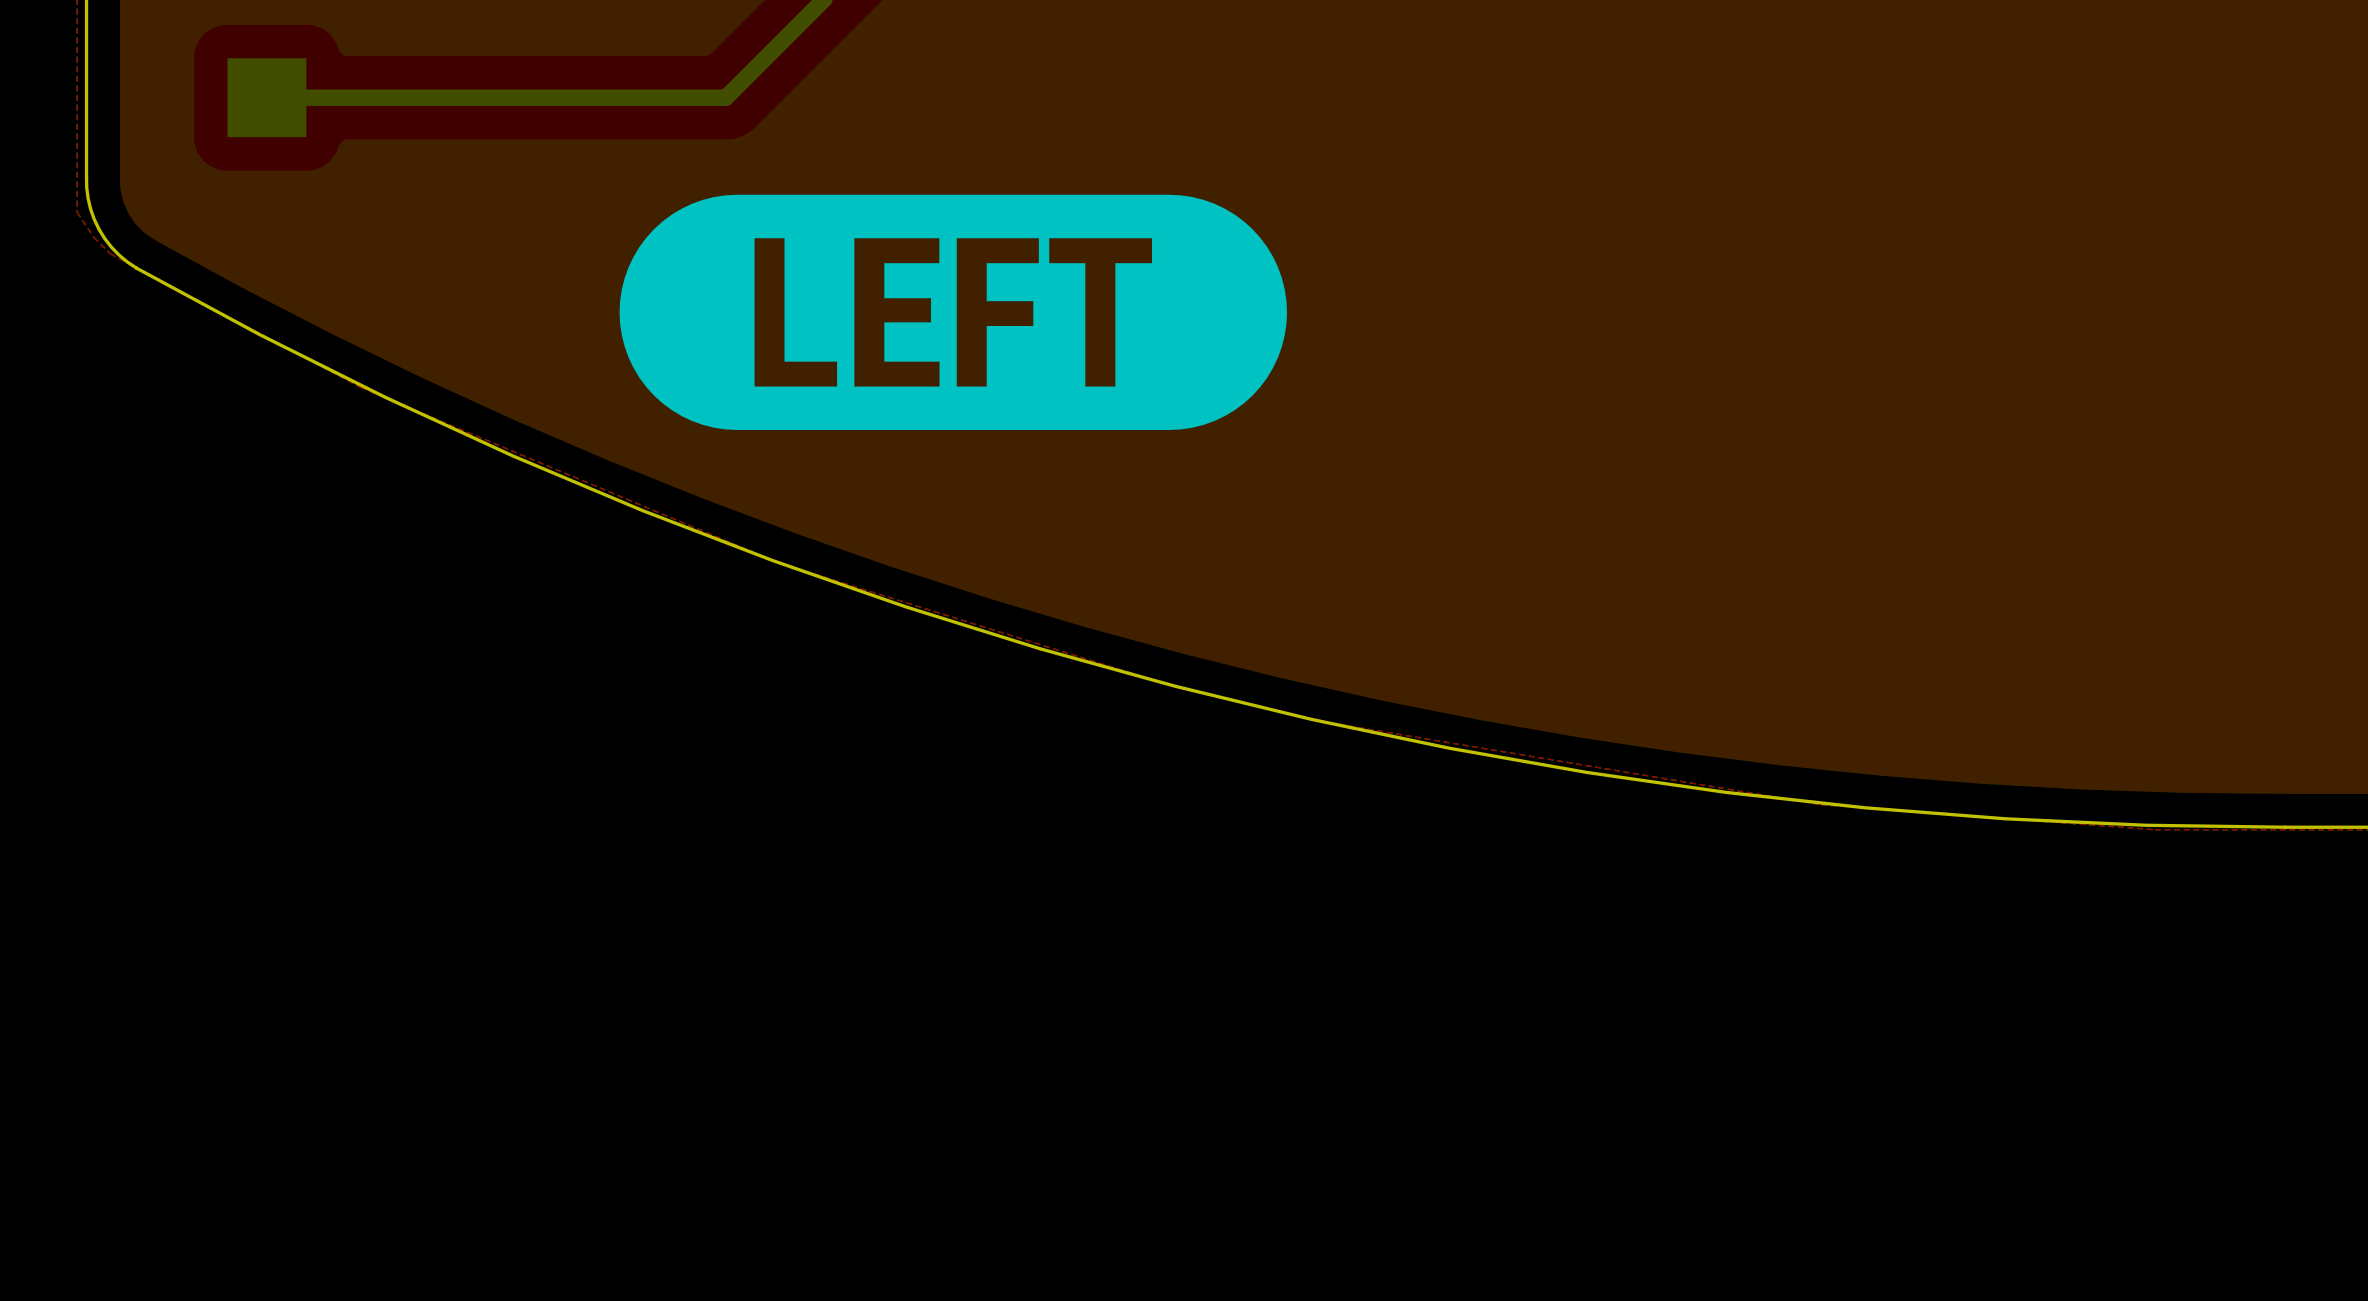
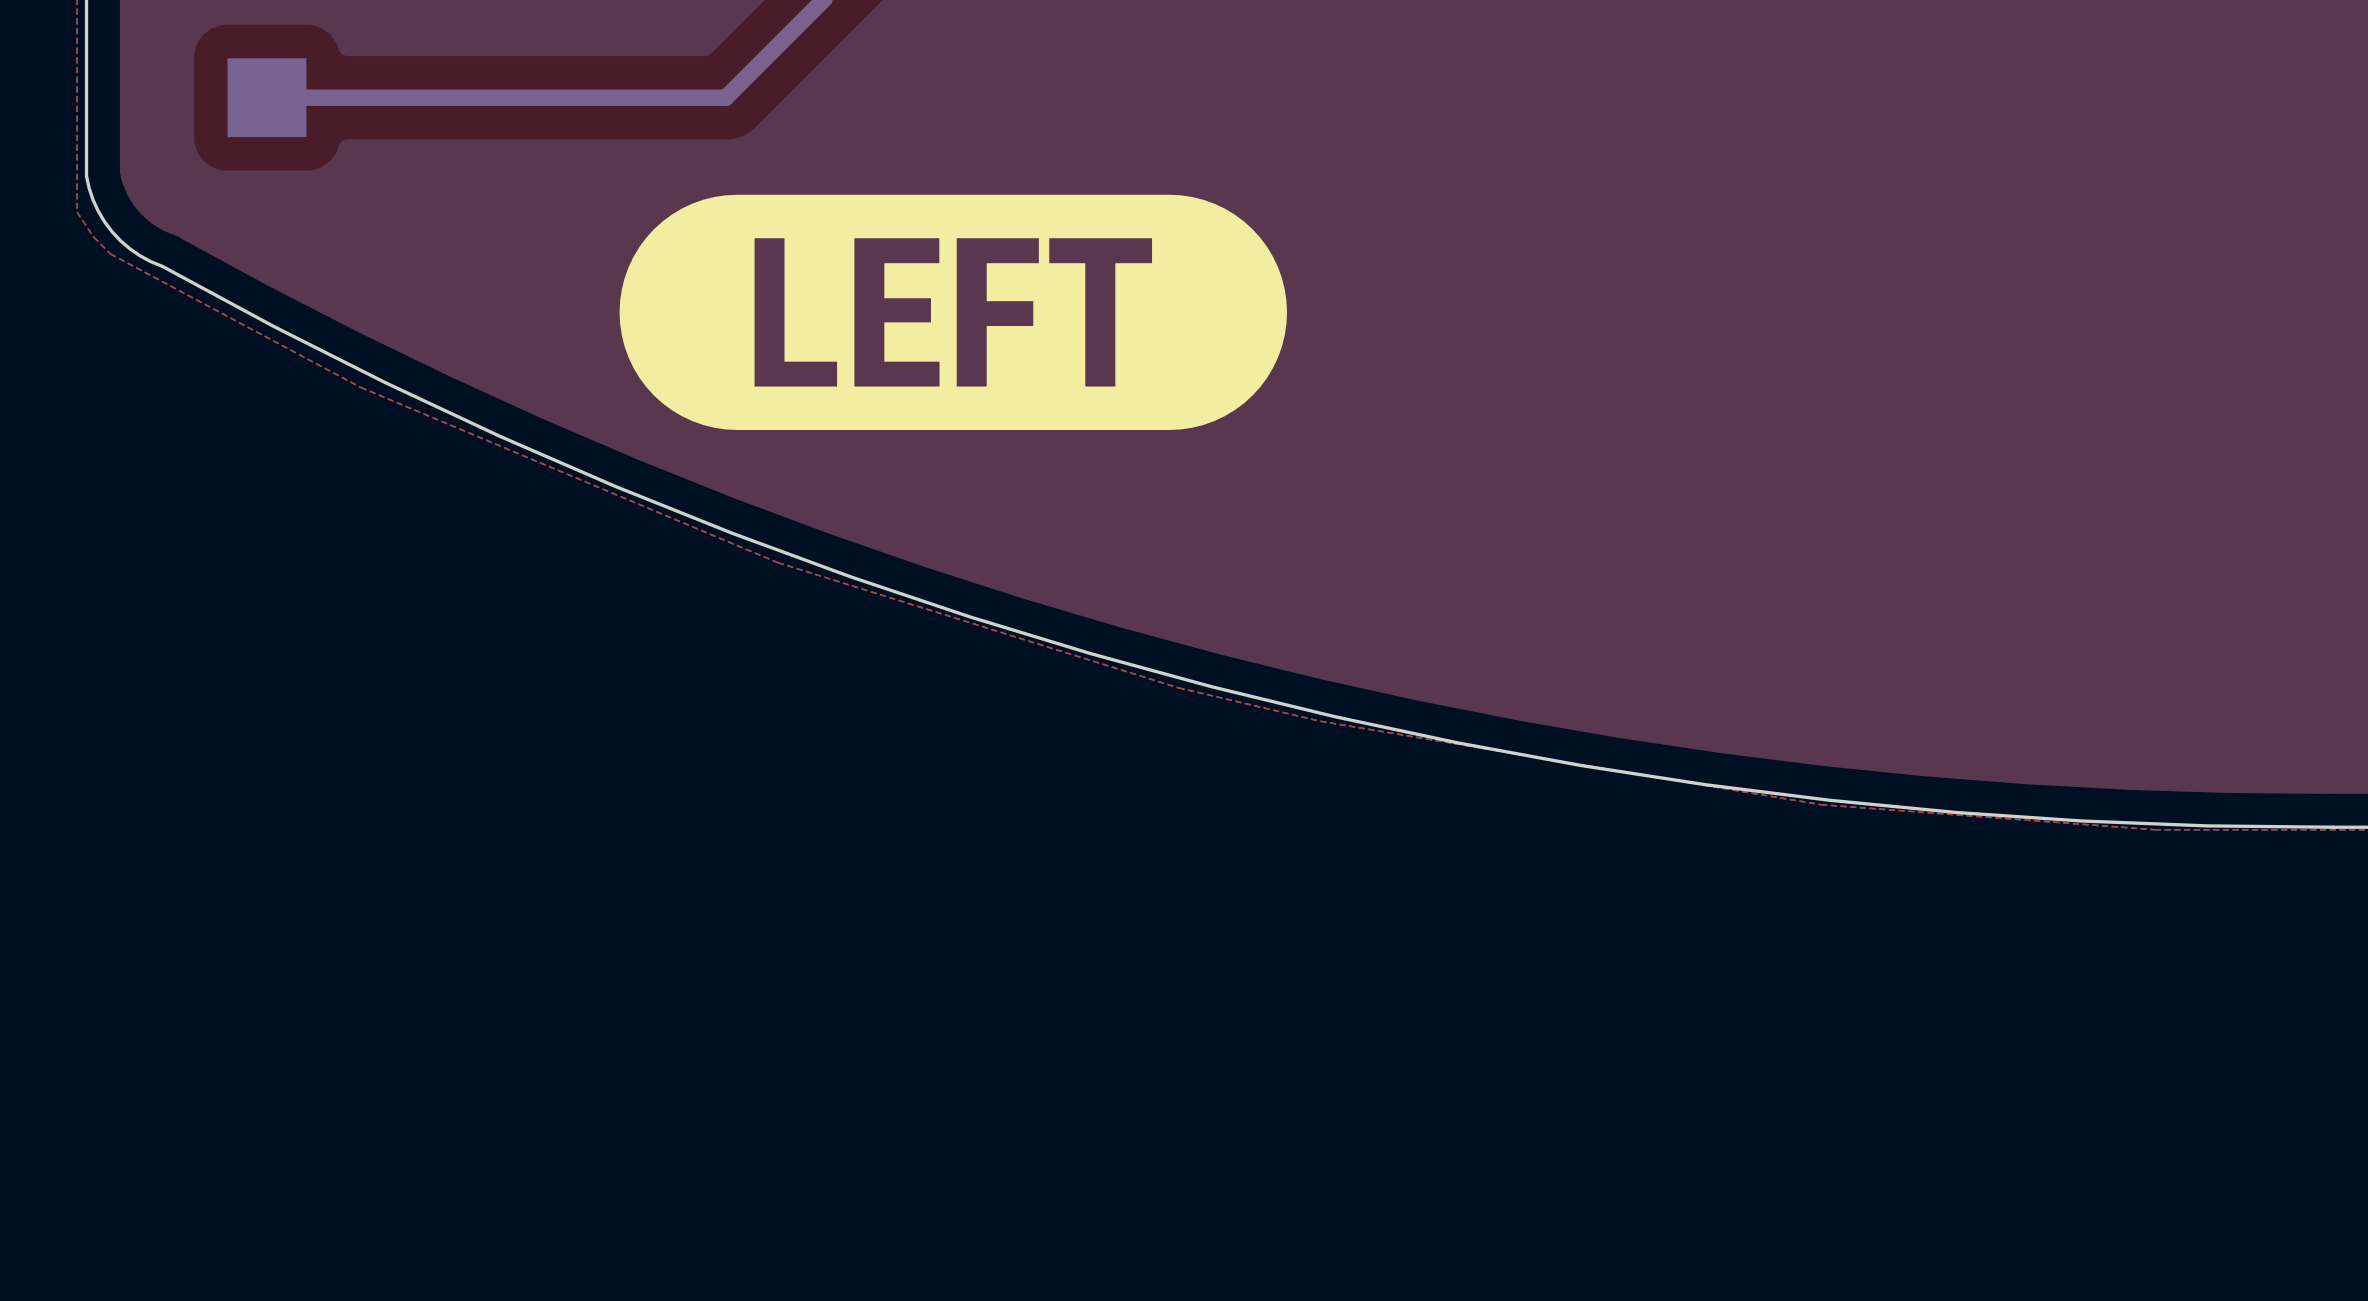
board edge: (86, 176) (90, 208) (98, 229) (111, 247) (127, 262) (260, 334) (385, 397) (513, 456) (642, 510) (773, 560) (906, 606) (1039, 648) (1175, 686) (1311, 719) (1448, 748) (1587, 772) (1725, 792) (1865, 807) (2005, 818) (2145, 825) (2333, 827) -> (86, 176) (98, 211) (112, 231) (130, 248) (273, 326) (385, 382) (499, 436) (615, 486) (732, 533) (850, 576) (969, 616) (1090, 653) (1211, 686) (1334, 716) (1457, 742) (1581, 765) (1705, 784) (1830, 800) (1955, 812) (2081, 820) (2207, 825) (2333, 827)

